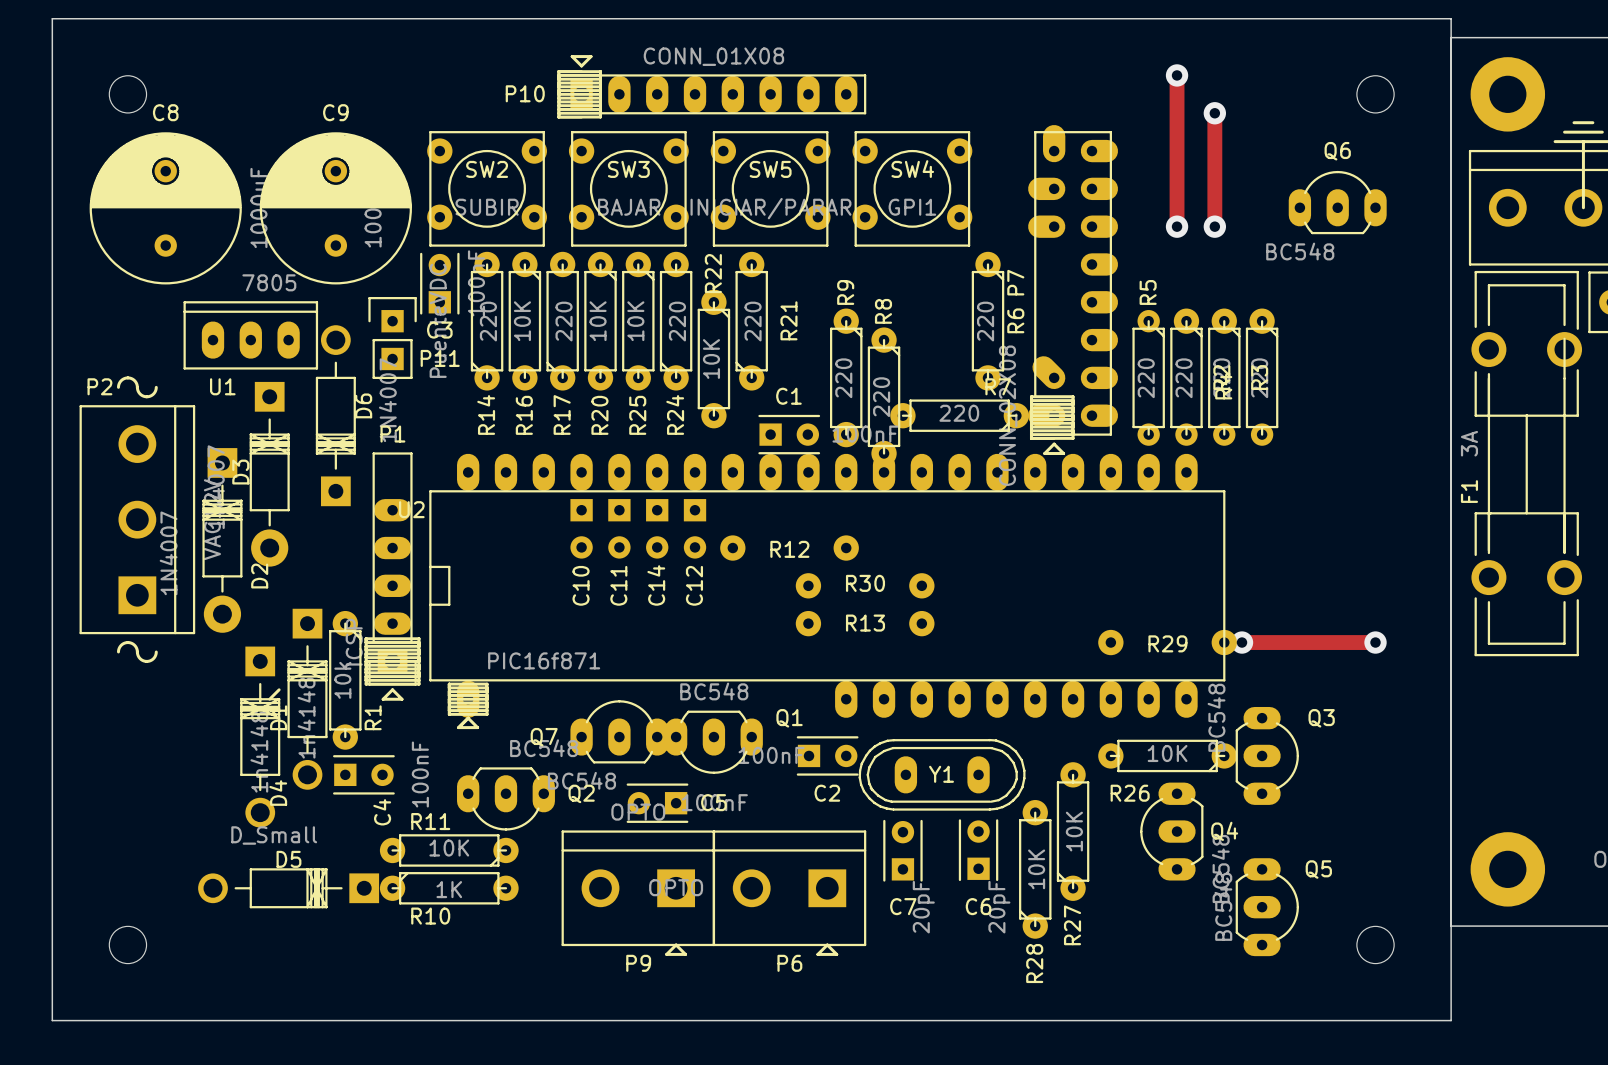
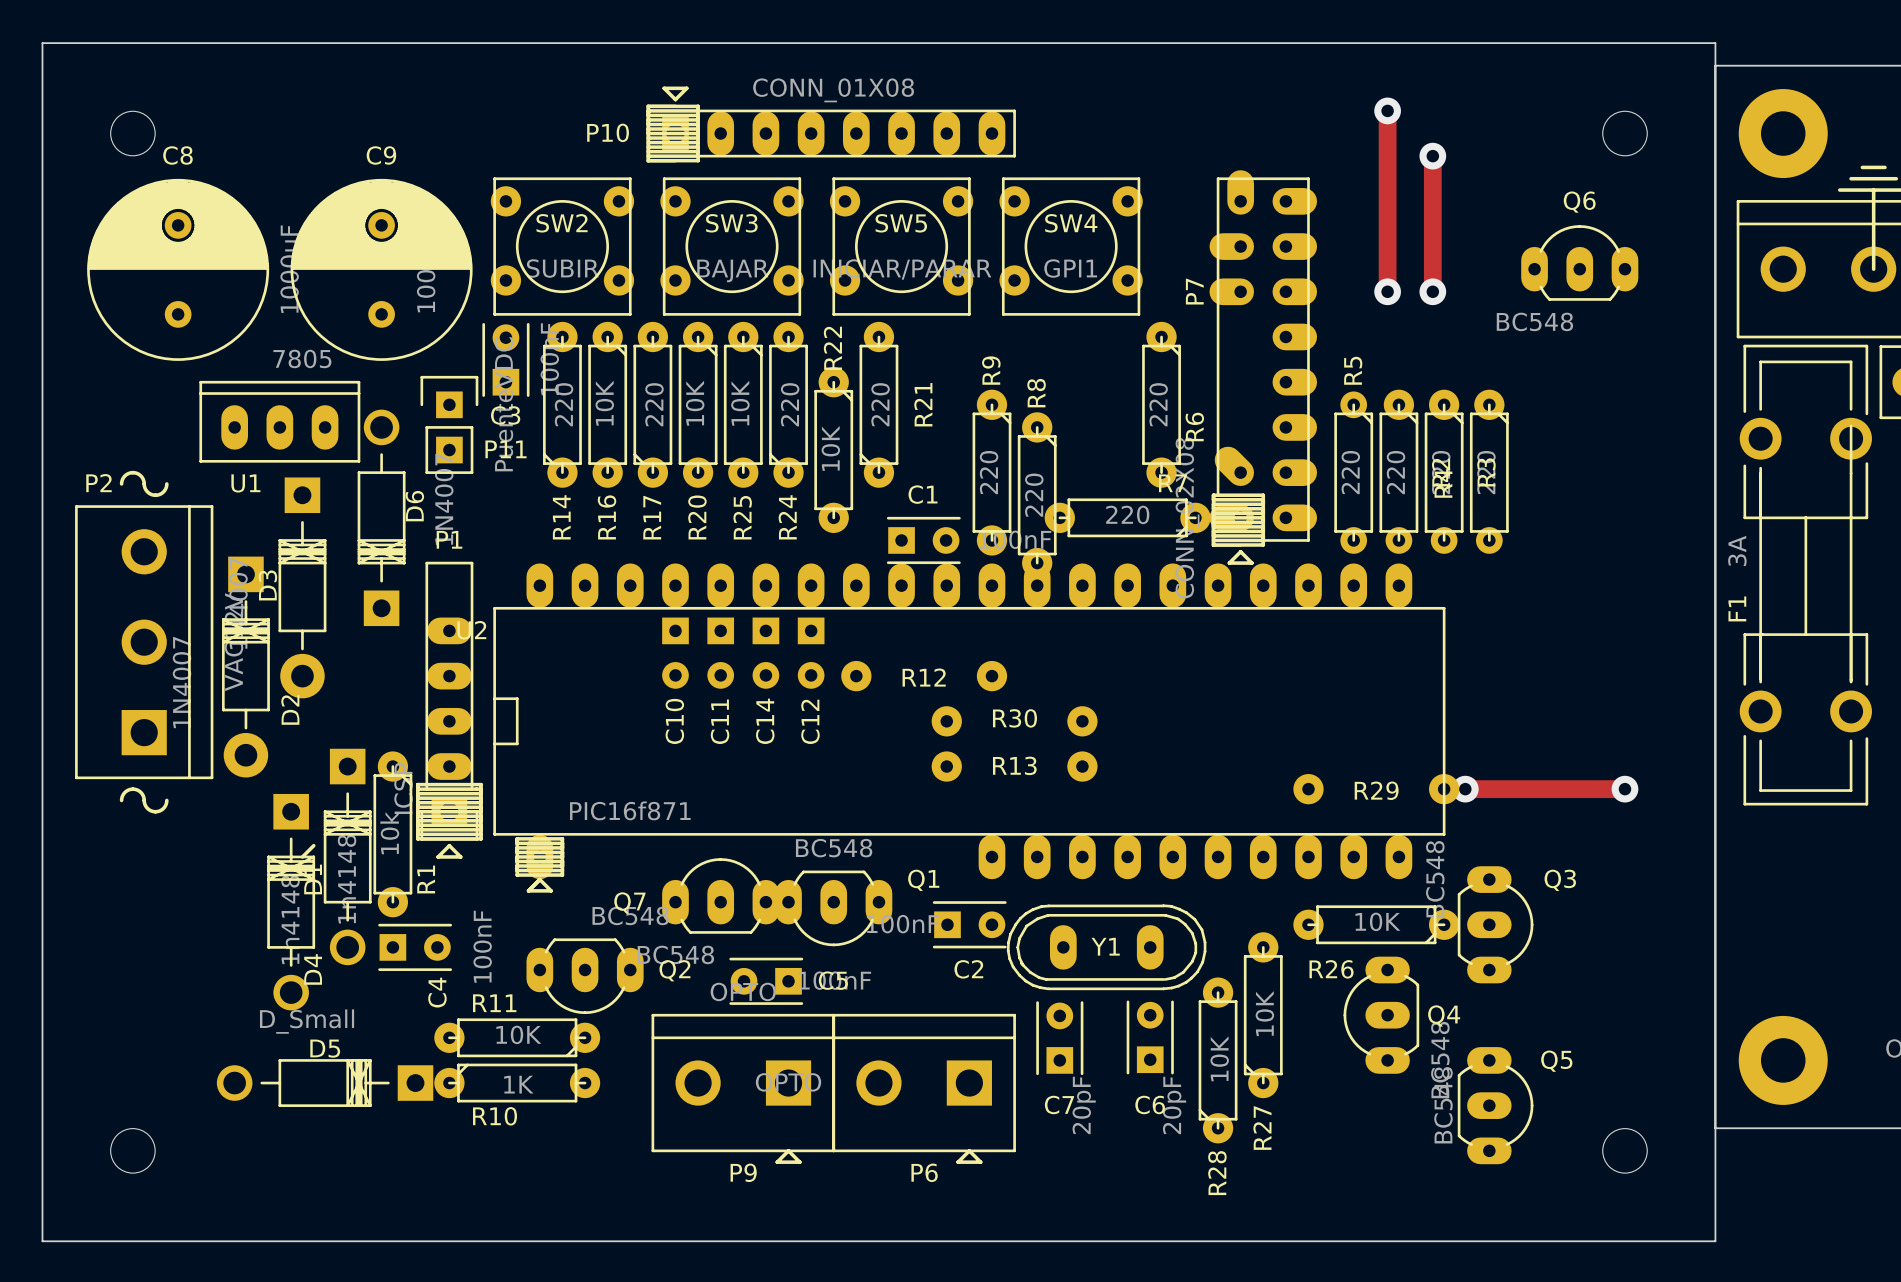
P7 name position: P7 (1015, 282) -> P7 (1194, 291)
R6 name position: R6 (1015, 320) -> R6 (1194, 427)

